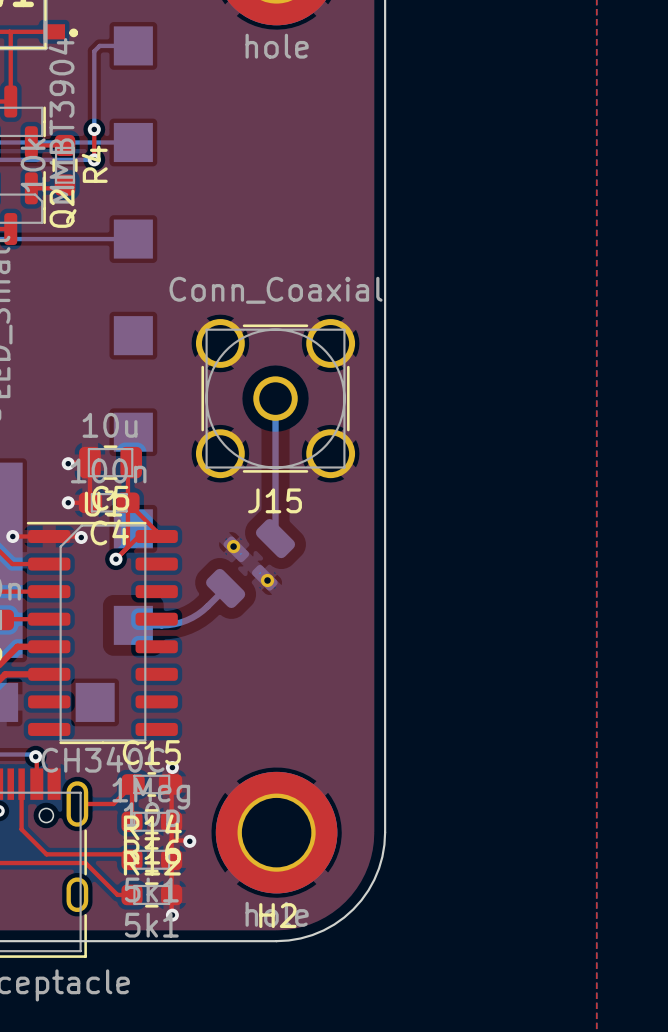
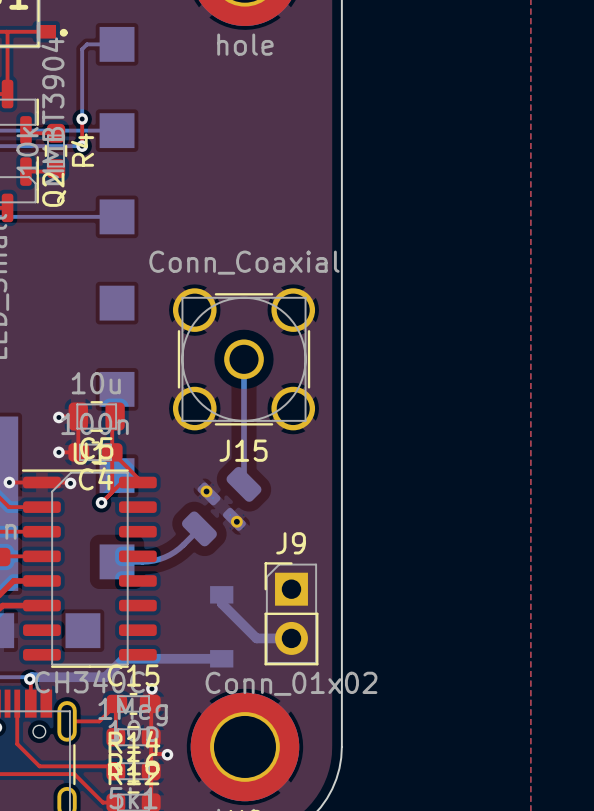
bottom track: none -> (221, 594) (221, 603) (256, 638) (291, 638)
J9: none -> Conn_01x02 (291, 613)
part: none -> (221, 626)
bottom track: none -> (221, 658) (123, 658) (105, 677) (31, 677) (29, 679)

